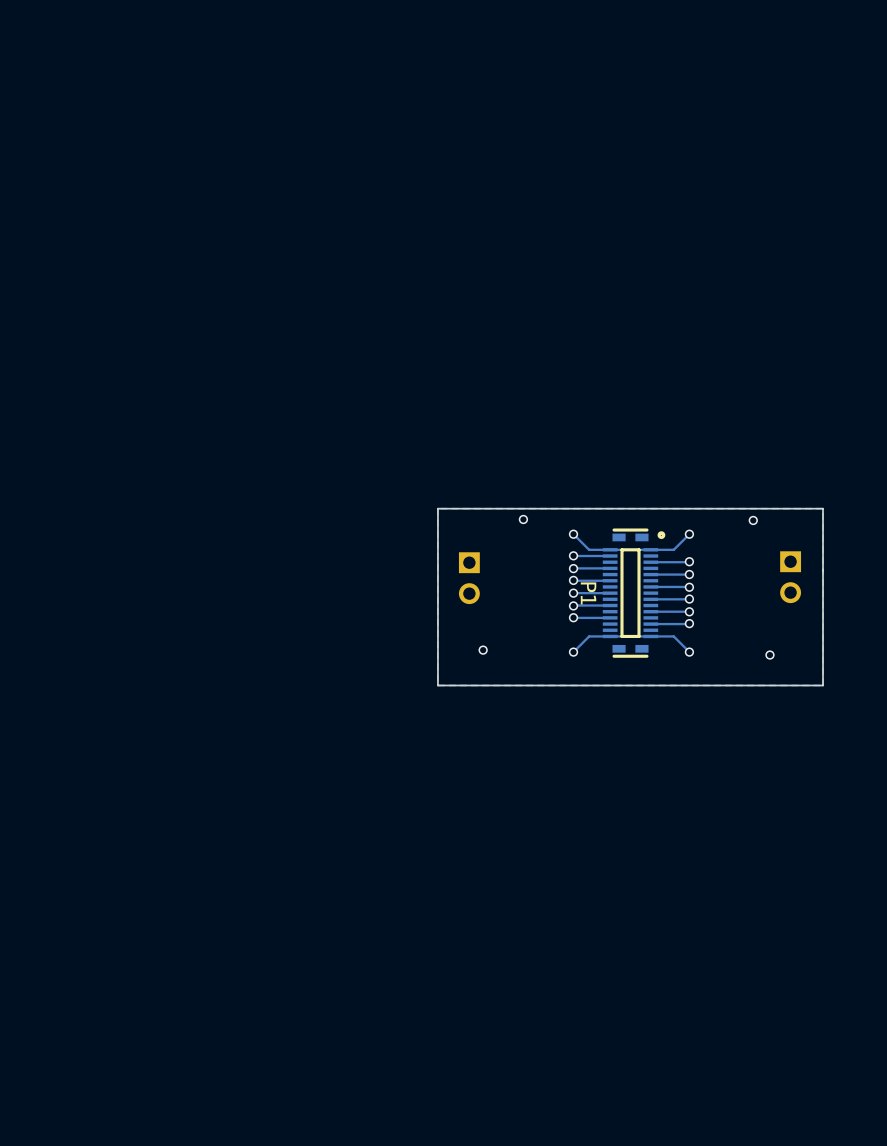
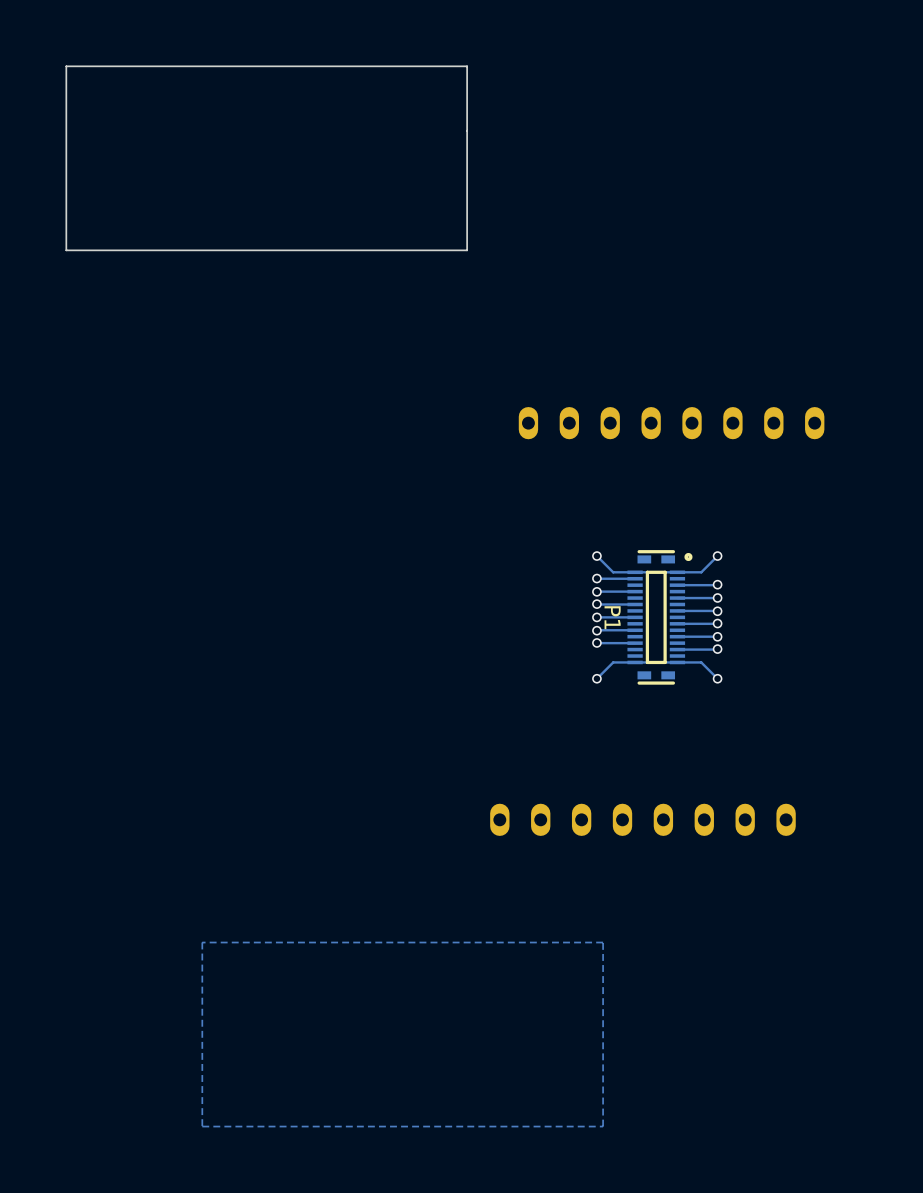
board edge: none -> (467, 66) (467, 250) (66, 250) (66, 66) (467, 66)
part: none -> (671, 423)
board edge: (823, 508) (823, 685) (437, 685) (437, 508) (823, 508) -> none
via: (523, 519) -> none
via: (753, 520) -> none
part: (790, 577) -> none
part: (469, 578) -> none
via: (483, 650) -> none
via: (769, 655) -> none
part: none -> (642, 819)
zone outline: none -> (603, 942) (603, 1126) (202, 1126) (202, 942) (603, 942)

